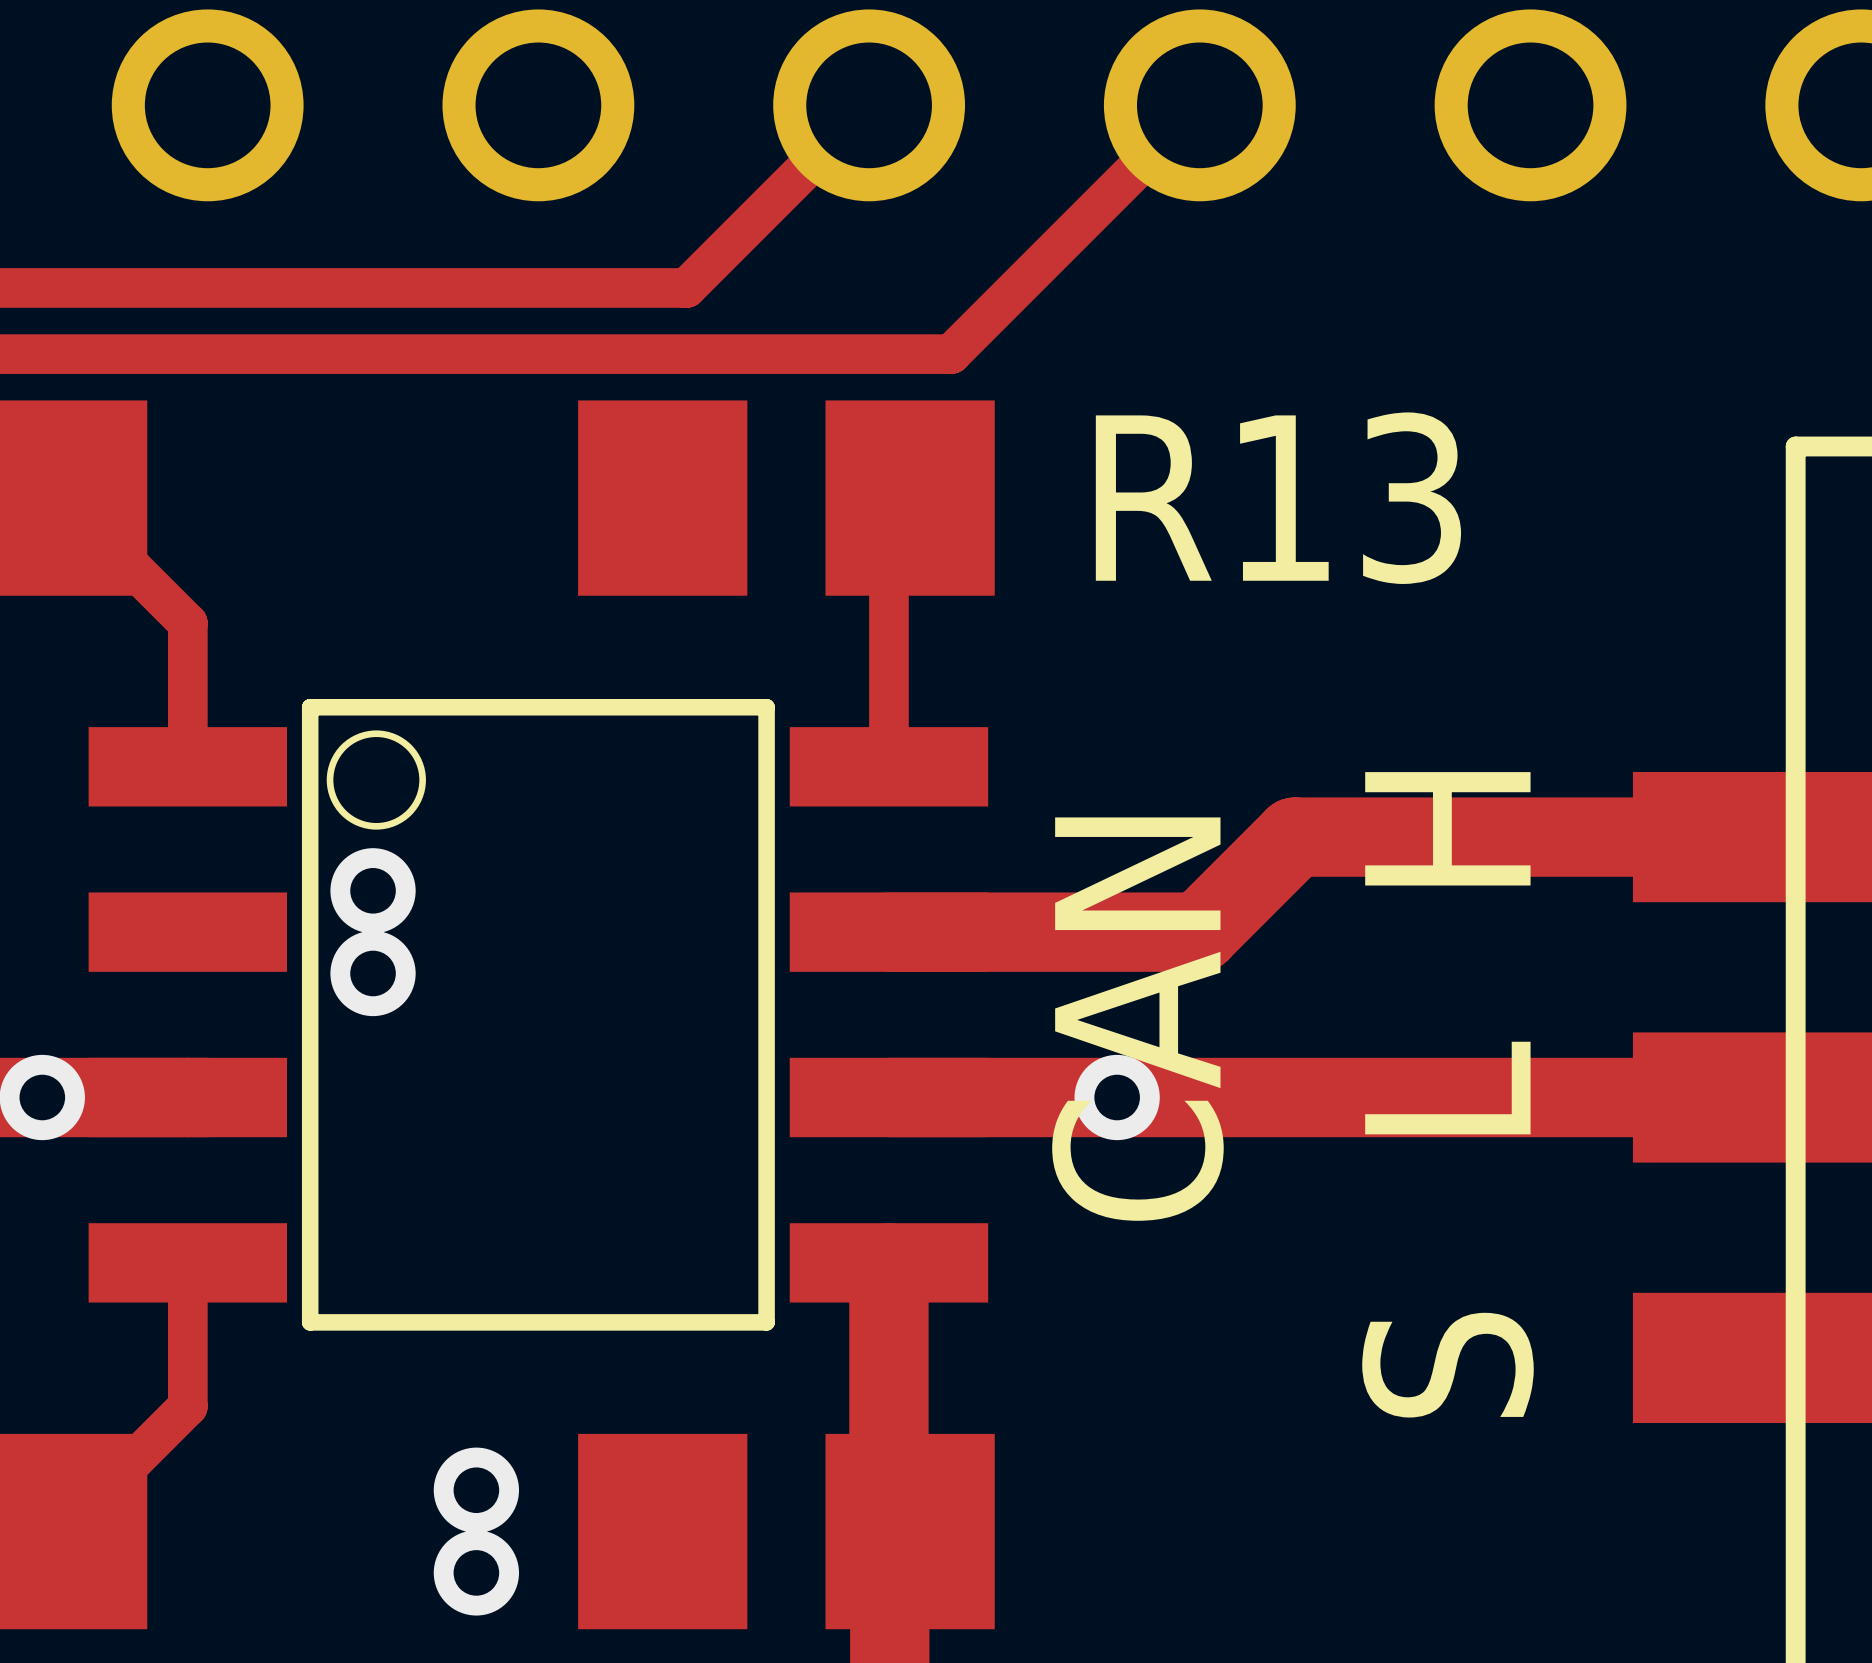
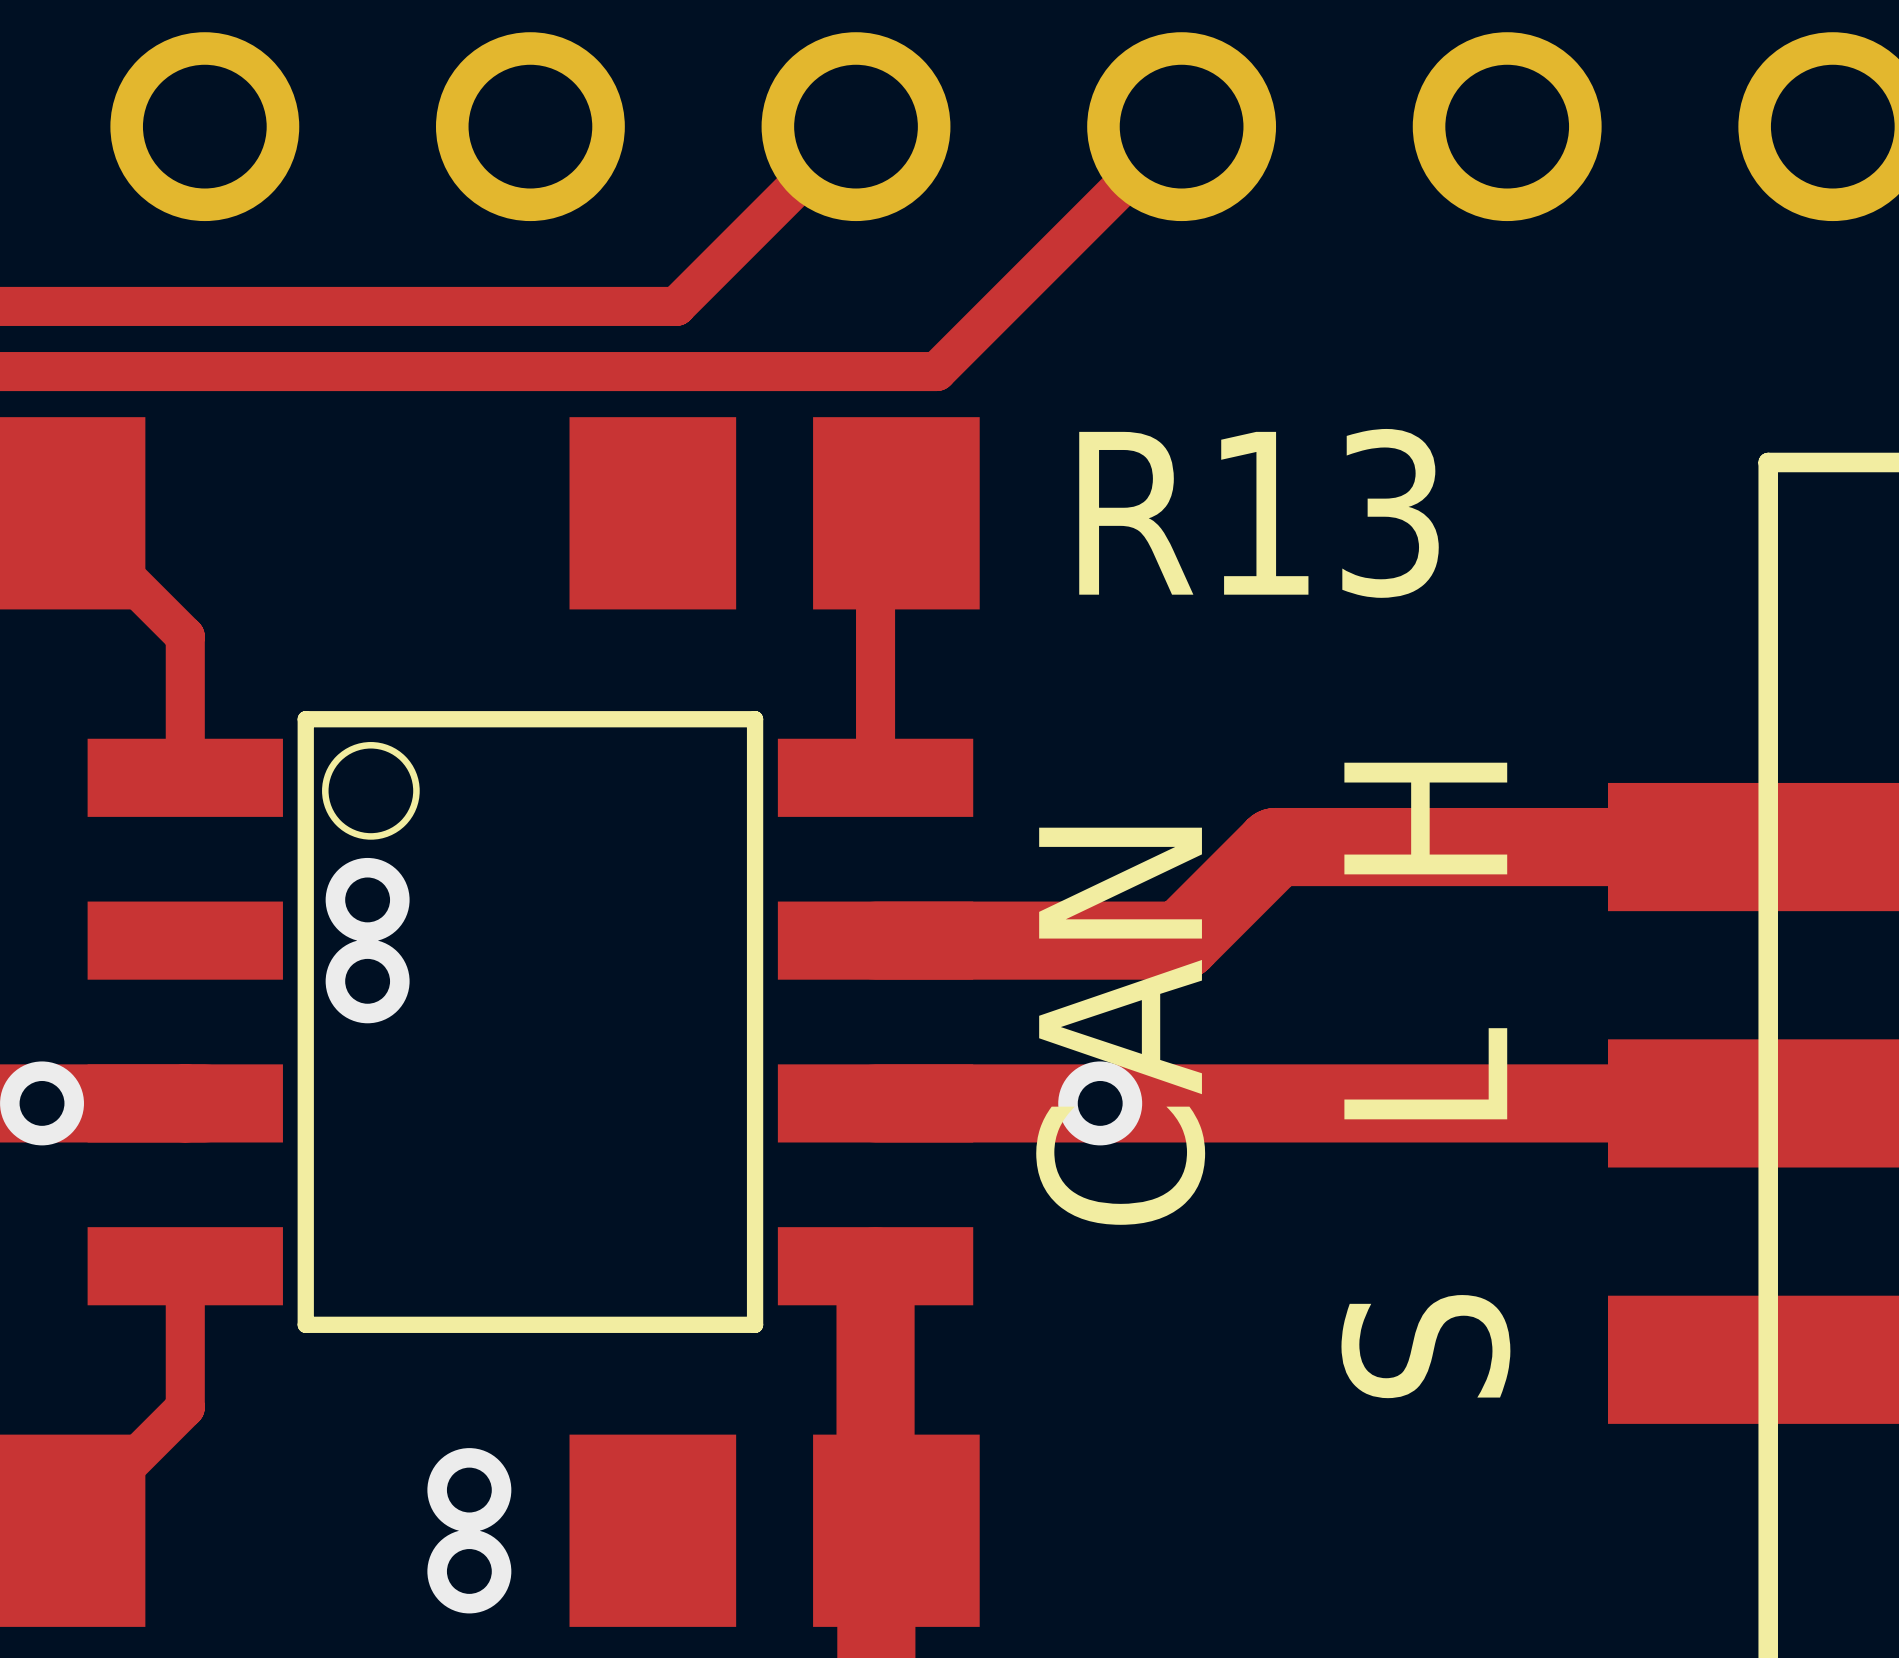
text position: H (1447, 828) -> H (1425, 818)
text position: L (1447, 1088) -> L (1425, 1073)
text position: S (1447, 1365) -> S (1425, 1346)

